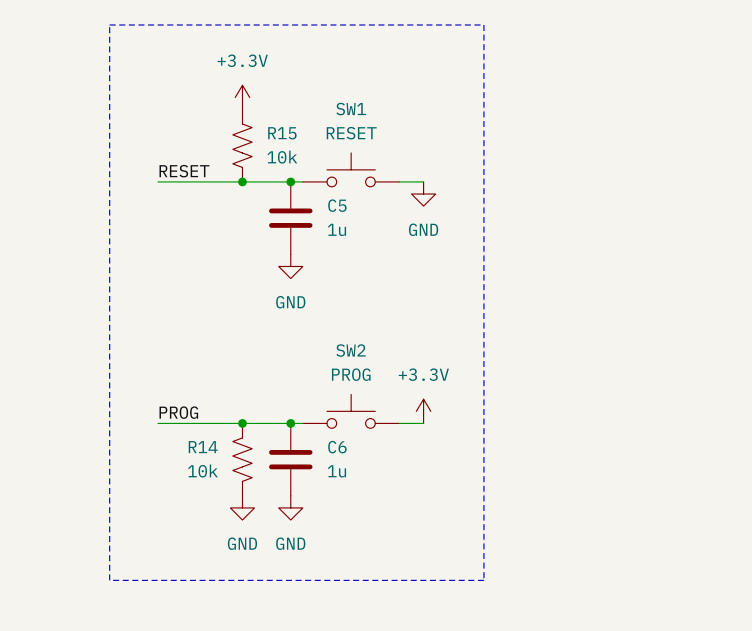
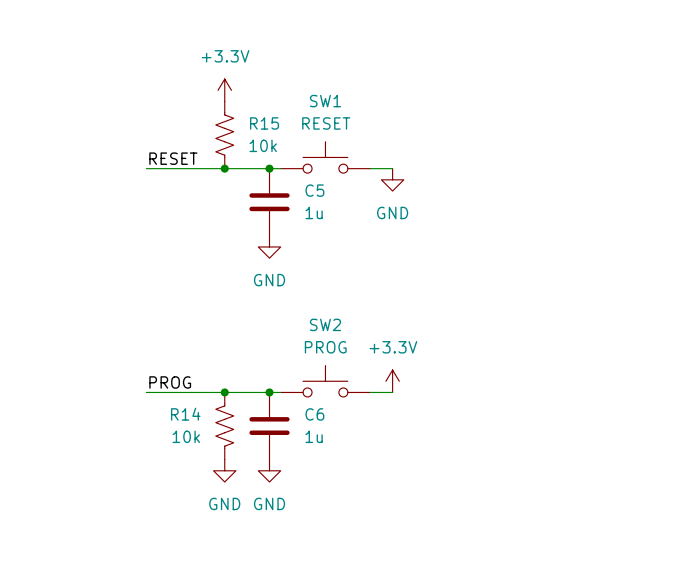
line: (109, 24) (483, 24) (483, 580) (109, 580) (109, 24) -> none

